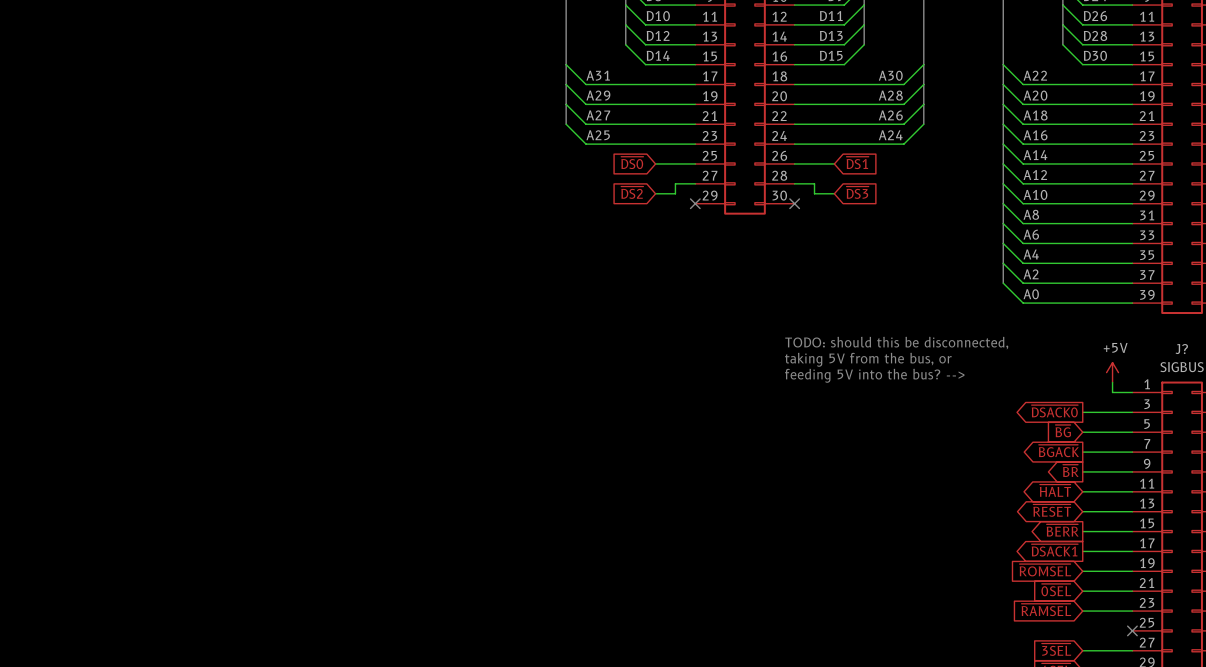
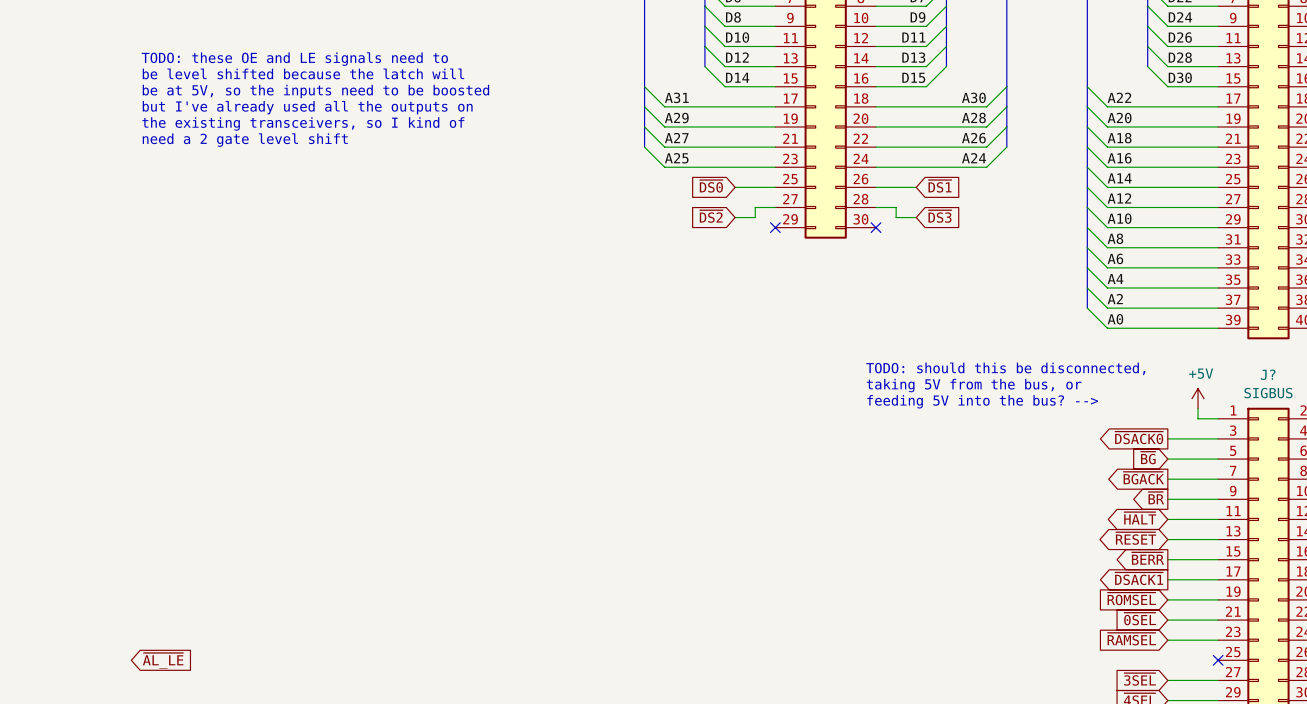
text: none -> TODO: these OE and LE signals need to (294, 59)
text: none -> be level shifted because the latch will (303, 73)
text: none -> be at 5V, so the inputs need to be boosted (315, 91)
text: none -> but I've already used all the outputs on (307, 107)
text: none -> the existing transceivers, so I kind of (303, 123)
text: none -> need a 2 gate level shift (245, 140)
global label: none -> ~{AL_LE} (163, 660)

